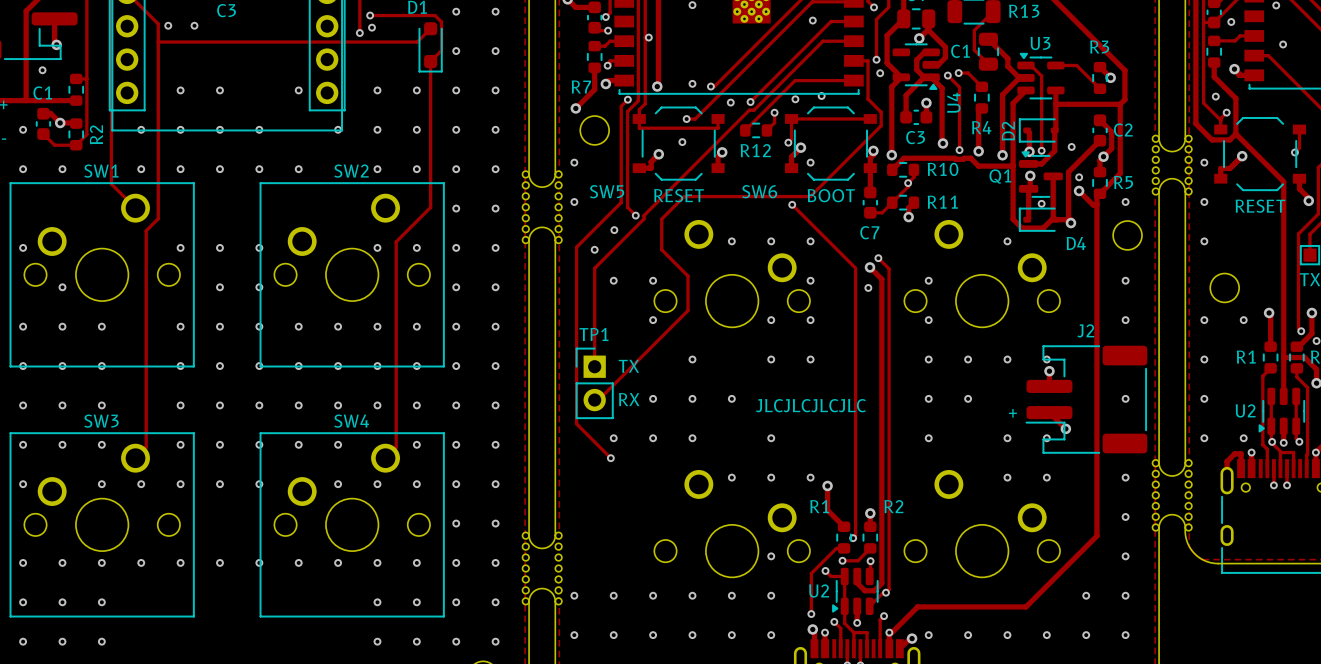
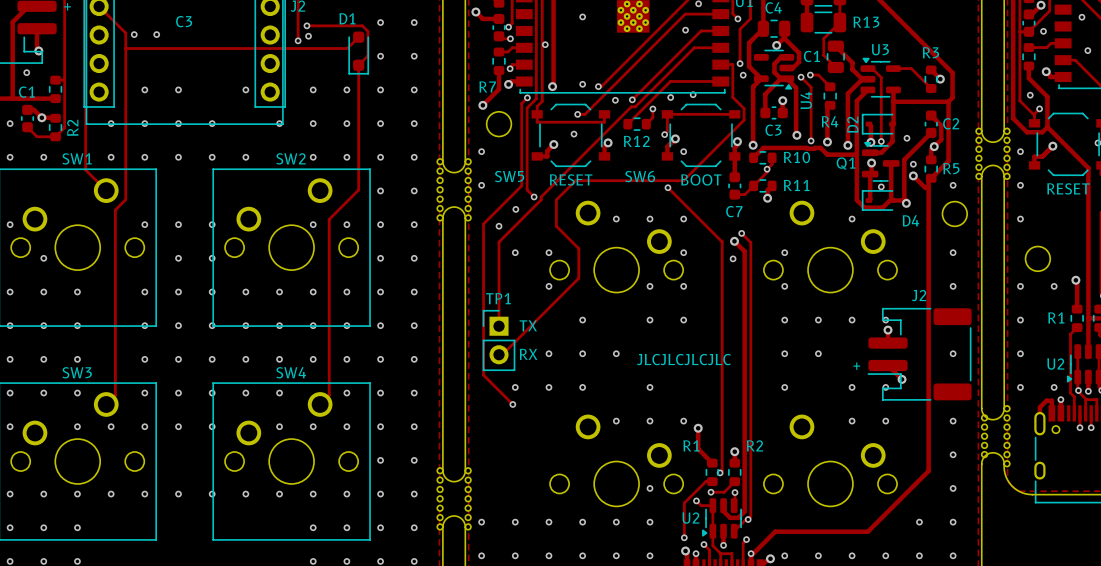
part: (1155, 463) -> none
part: (1155, 473) -> none
part: none -> (984, 417)
part: (1155, 484) -> none
part: none -> (984, 427)
part: (1155, 495) -> none
part: none -> (984, 436)
part: (1155, 506) -> none
part: none -> (984, 445)
part: (1155, 516) -> none
part: none -> (984, 454)
part: (1155, 527) -> none

